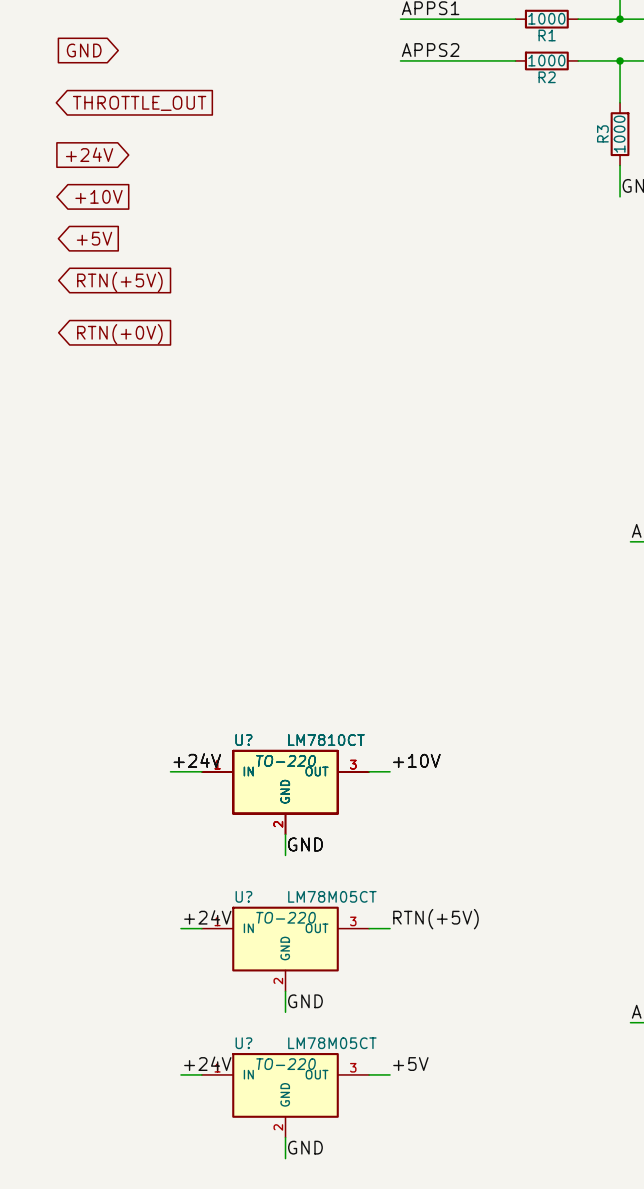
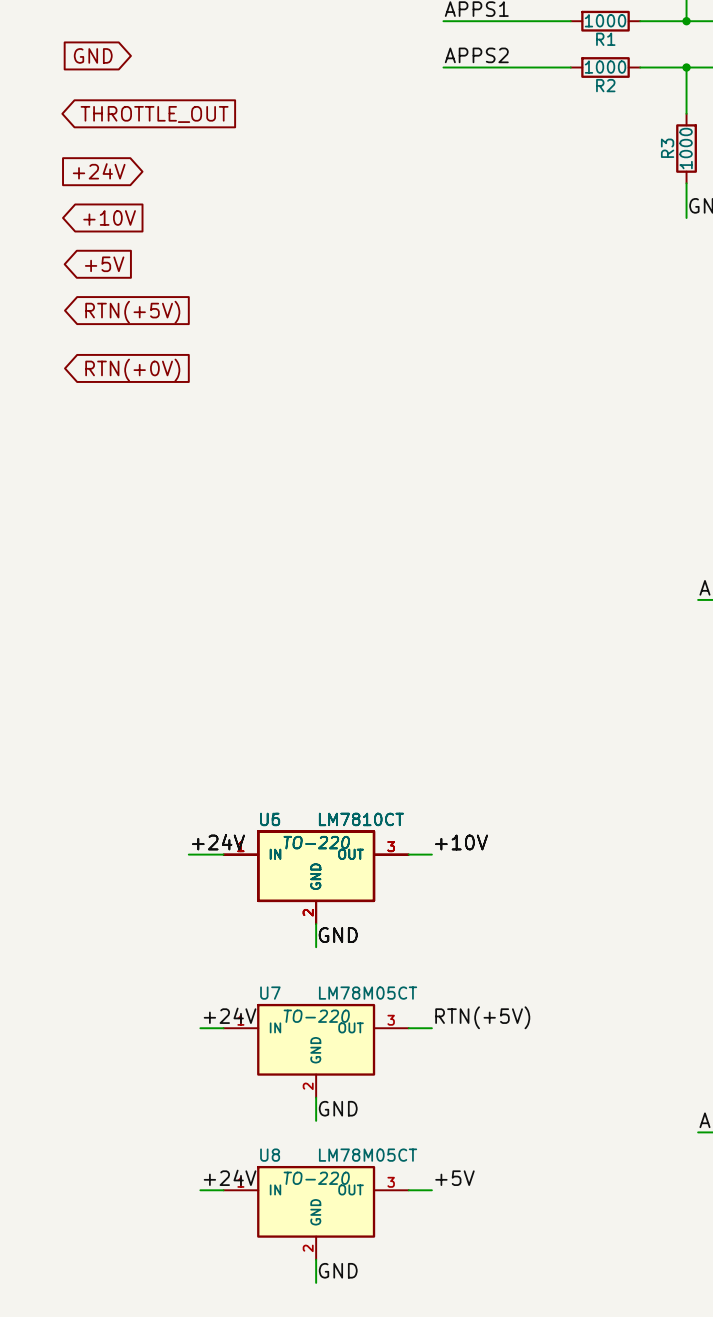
U?: LM7810CT (285, 792) -> none
part: none -> LM7810CT (316, 877)
part: none -> LM7810CT (316, 877)
U? name: U? (243, 896) -> U7 (270, 993)
U? name: U? (243, 1043) -> U8 (270, 1155)

